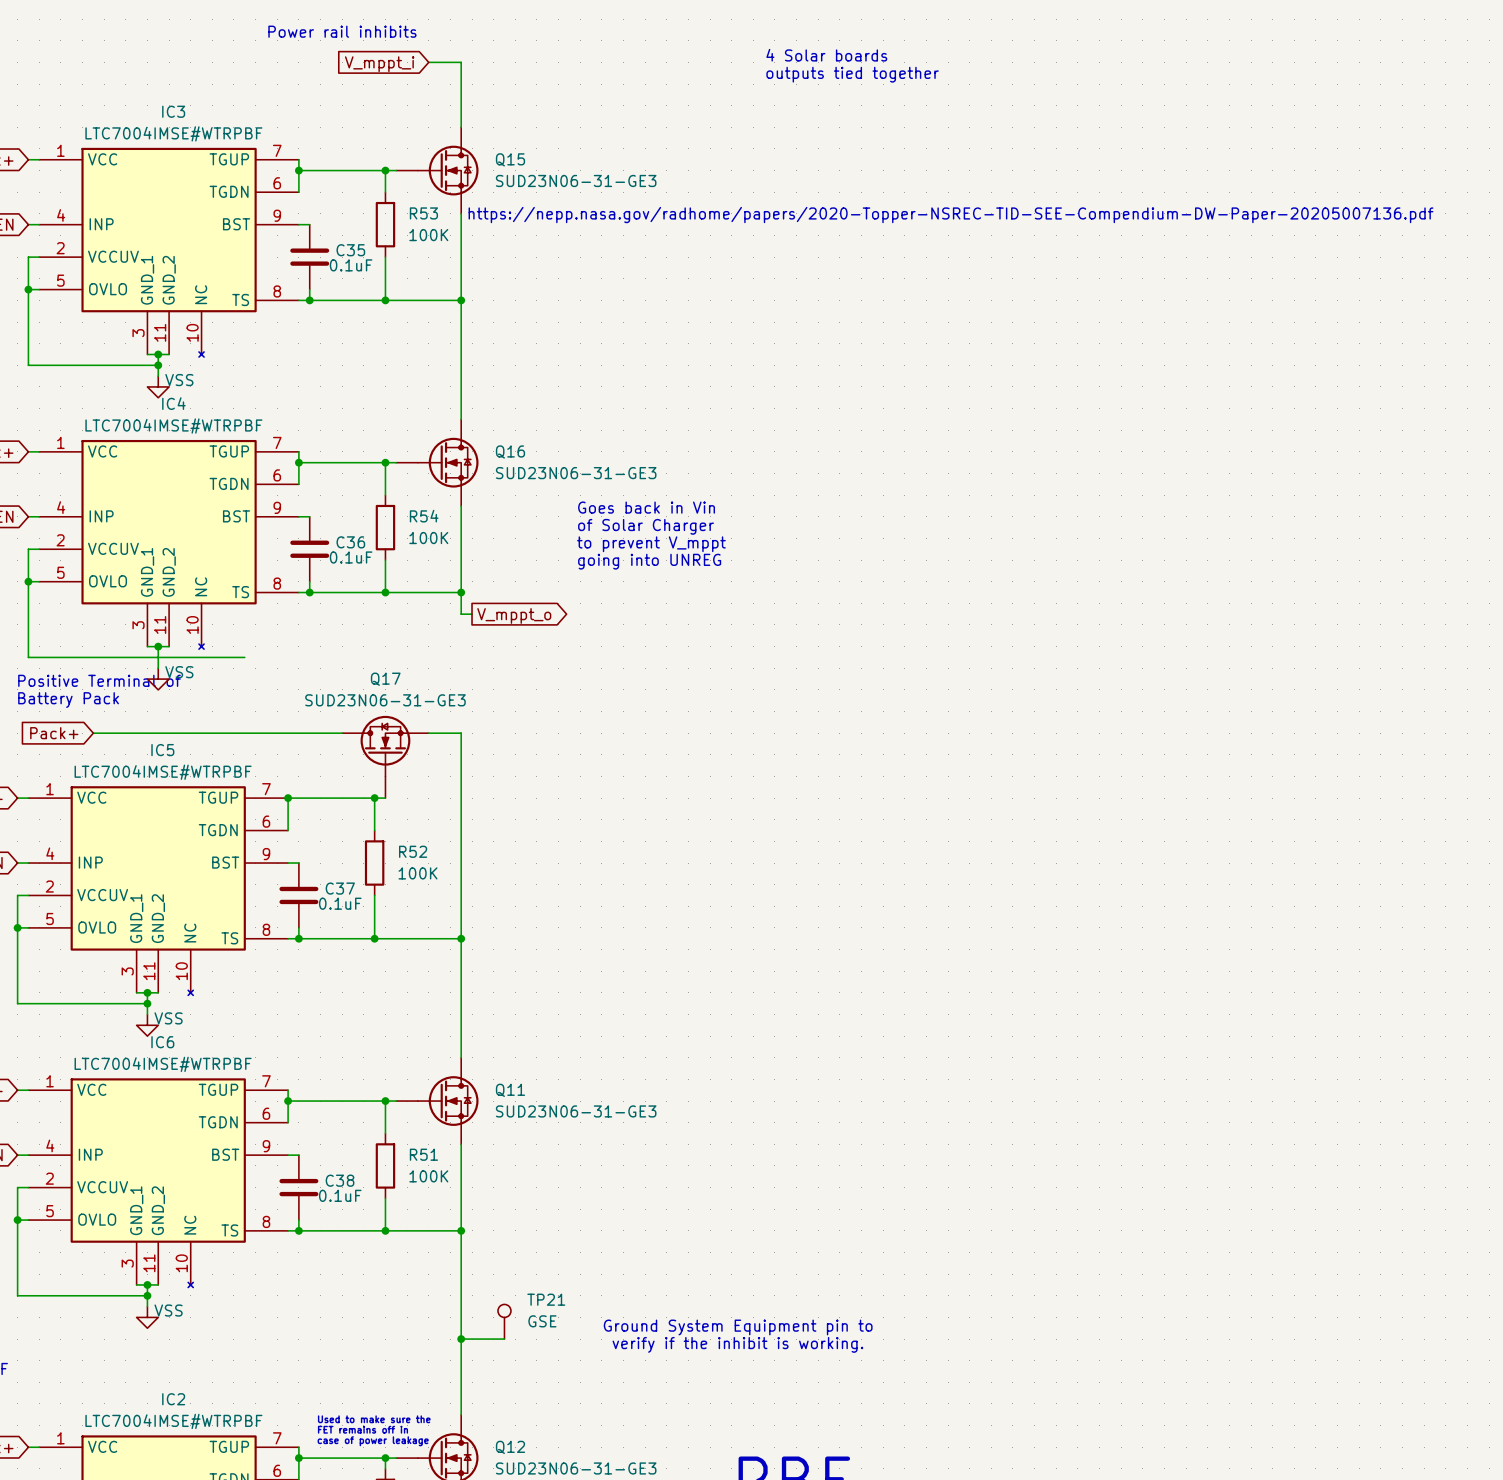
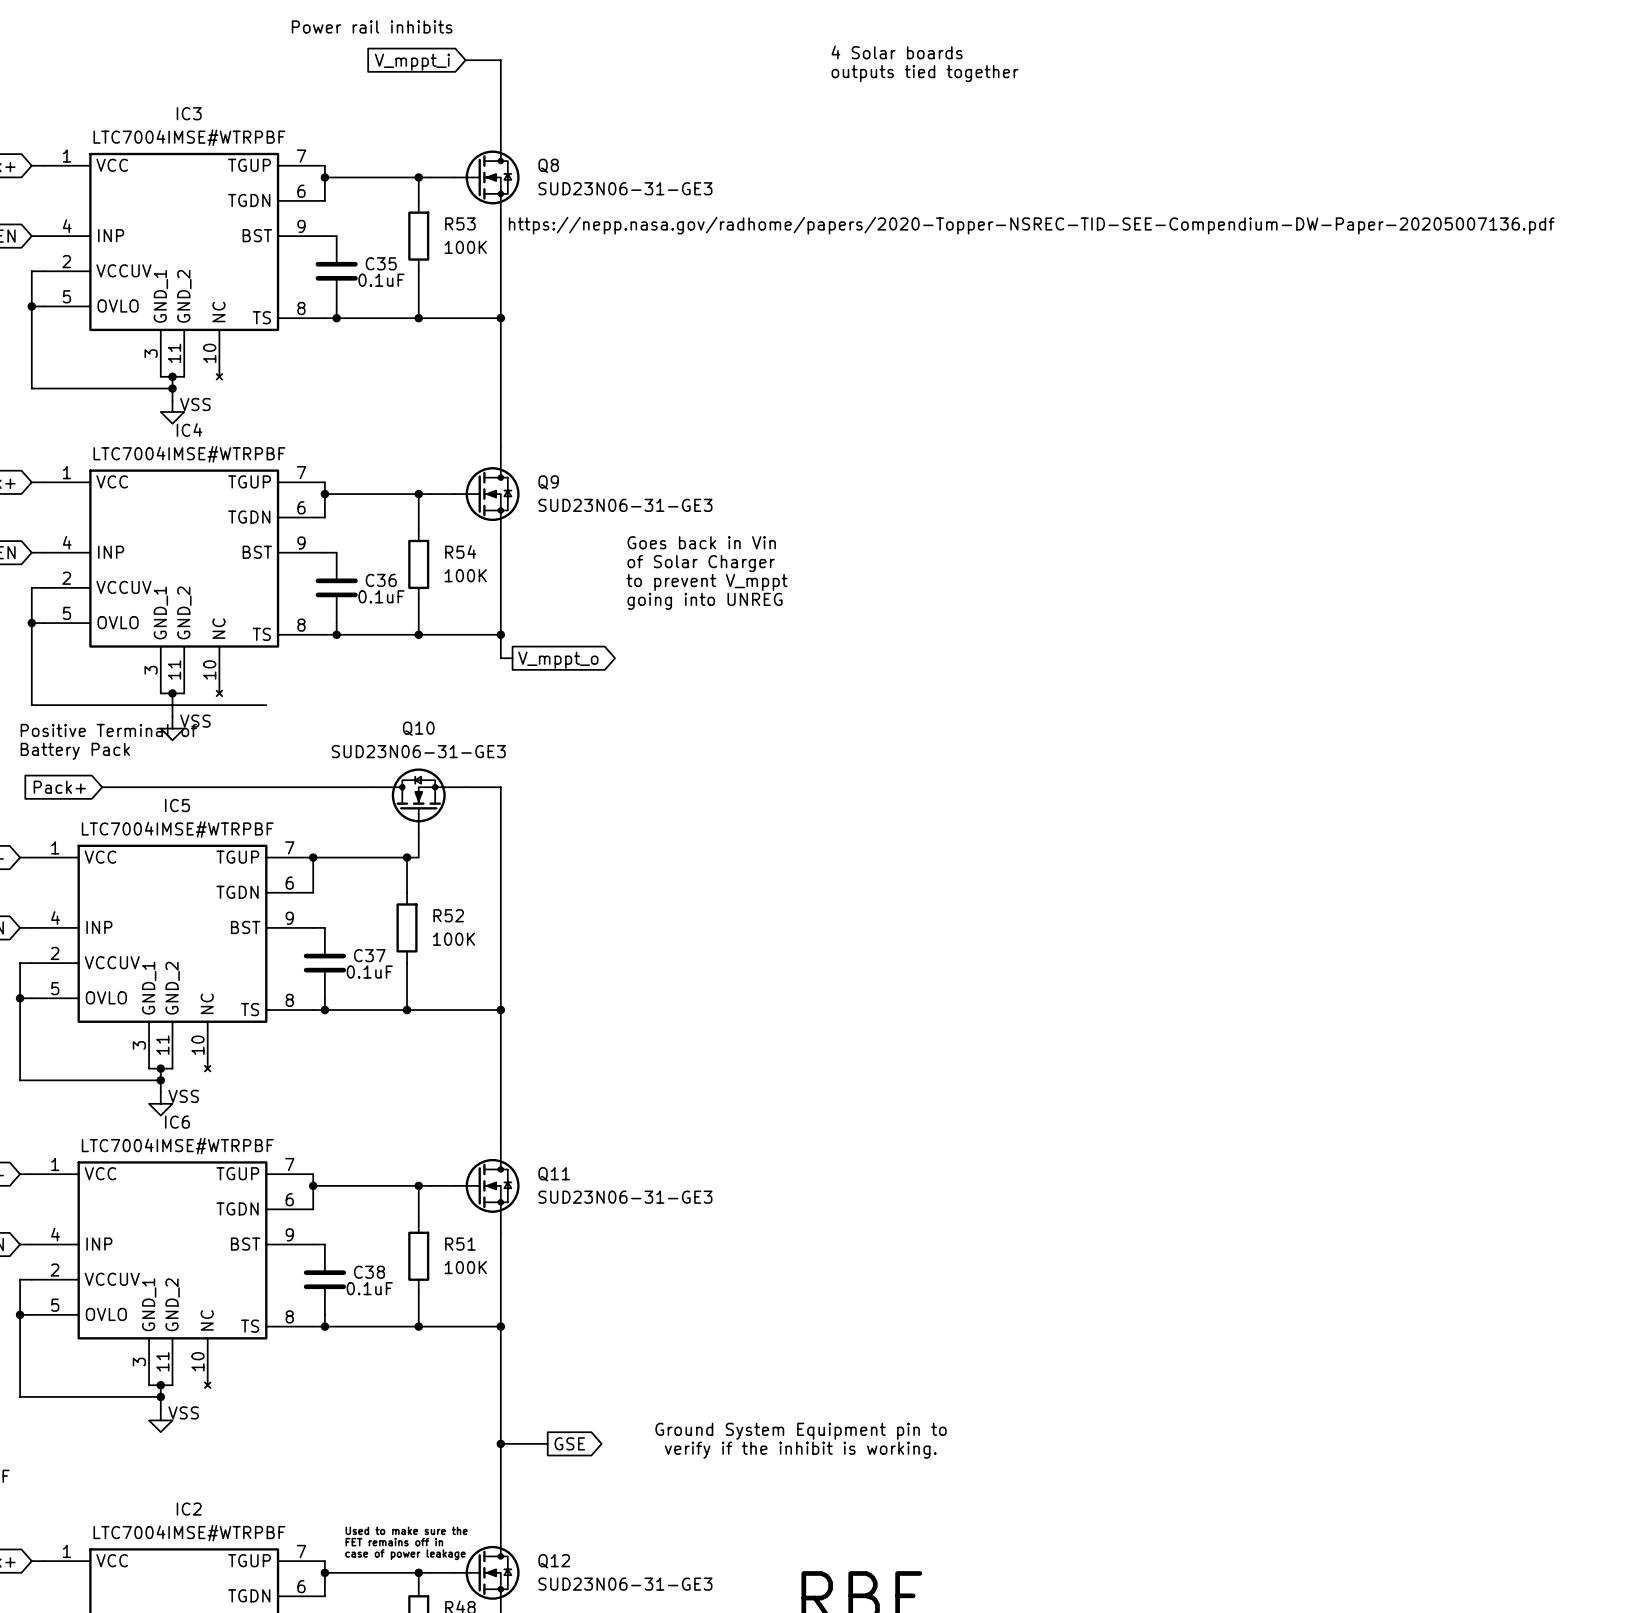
Q15 name: Q15 (510, 159) -> Q8 (548, 165)
Q16 name: Q16 (510, 451) -> Q9 (548, 482)
Q17 name: Q17 (385, 679) -> Q10 (418, 728)
TP21: GSE (504, 1321) -> none
global label: none -> GSE (569, 1443)

